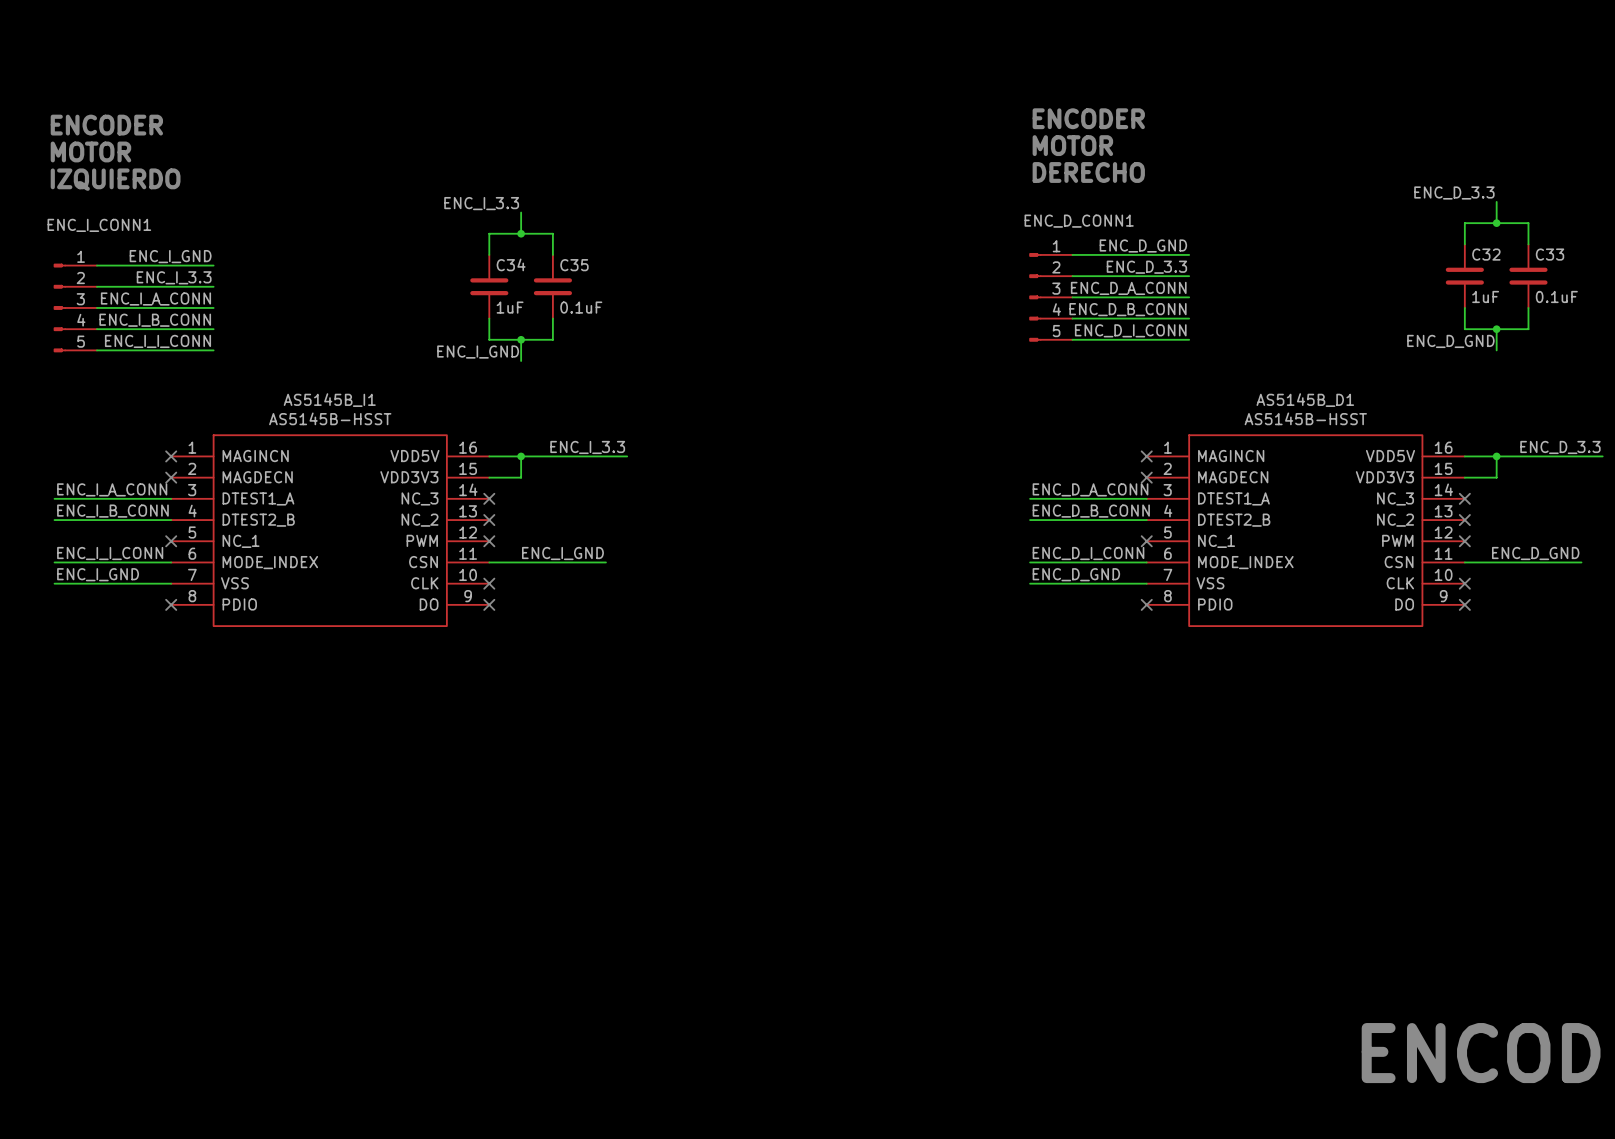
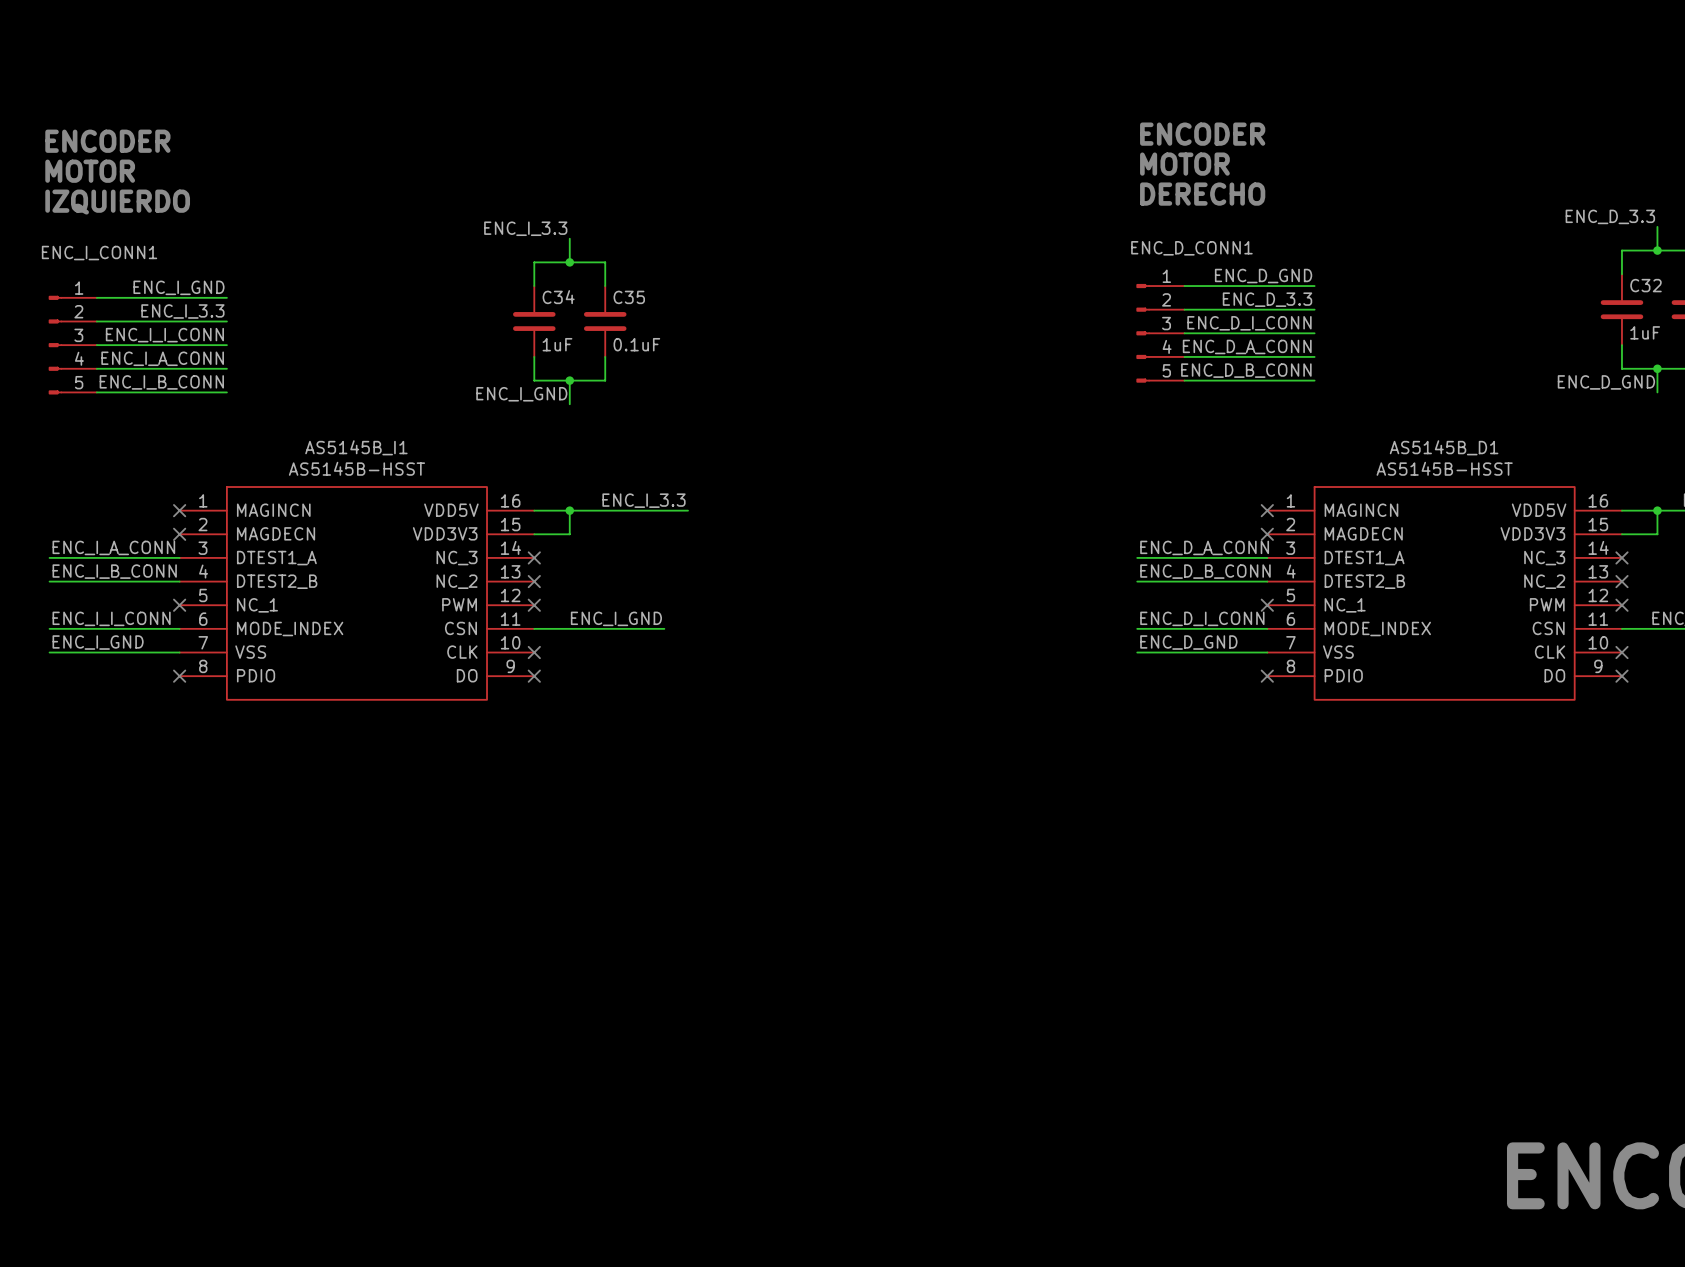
label: ENC_D_A_CONN (1128, 288) -> ENC_D_I_CONN (1249, 323)
label: ENC_I_A_CONN (155, 299) -> ENC_I_I_CONN (164, 335)
label: ENC_D_B_CONN (1127, 309) -> ENC_D_A_CONN (1247, 346)
label: ENC_I_B_CONN (155, 320) -> ENC_I_A_CONN (162, 358)
label: ENC_D_I_CONN (1130, 330) -> ENC_D_B_CONN (1246, 370)
label: ENC_I_I_CONN (157, 341) -> ENC_I_B_CONN (161, 382)

